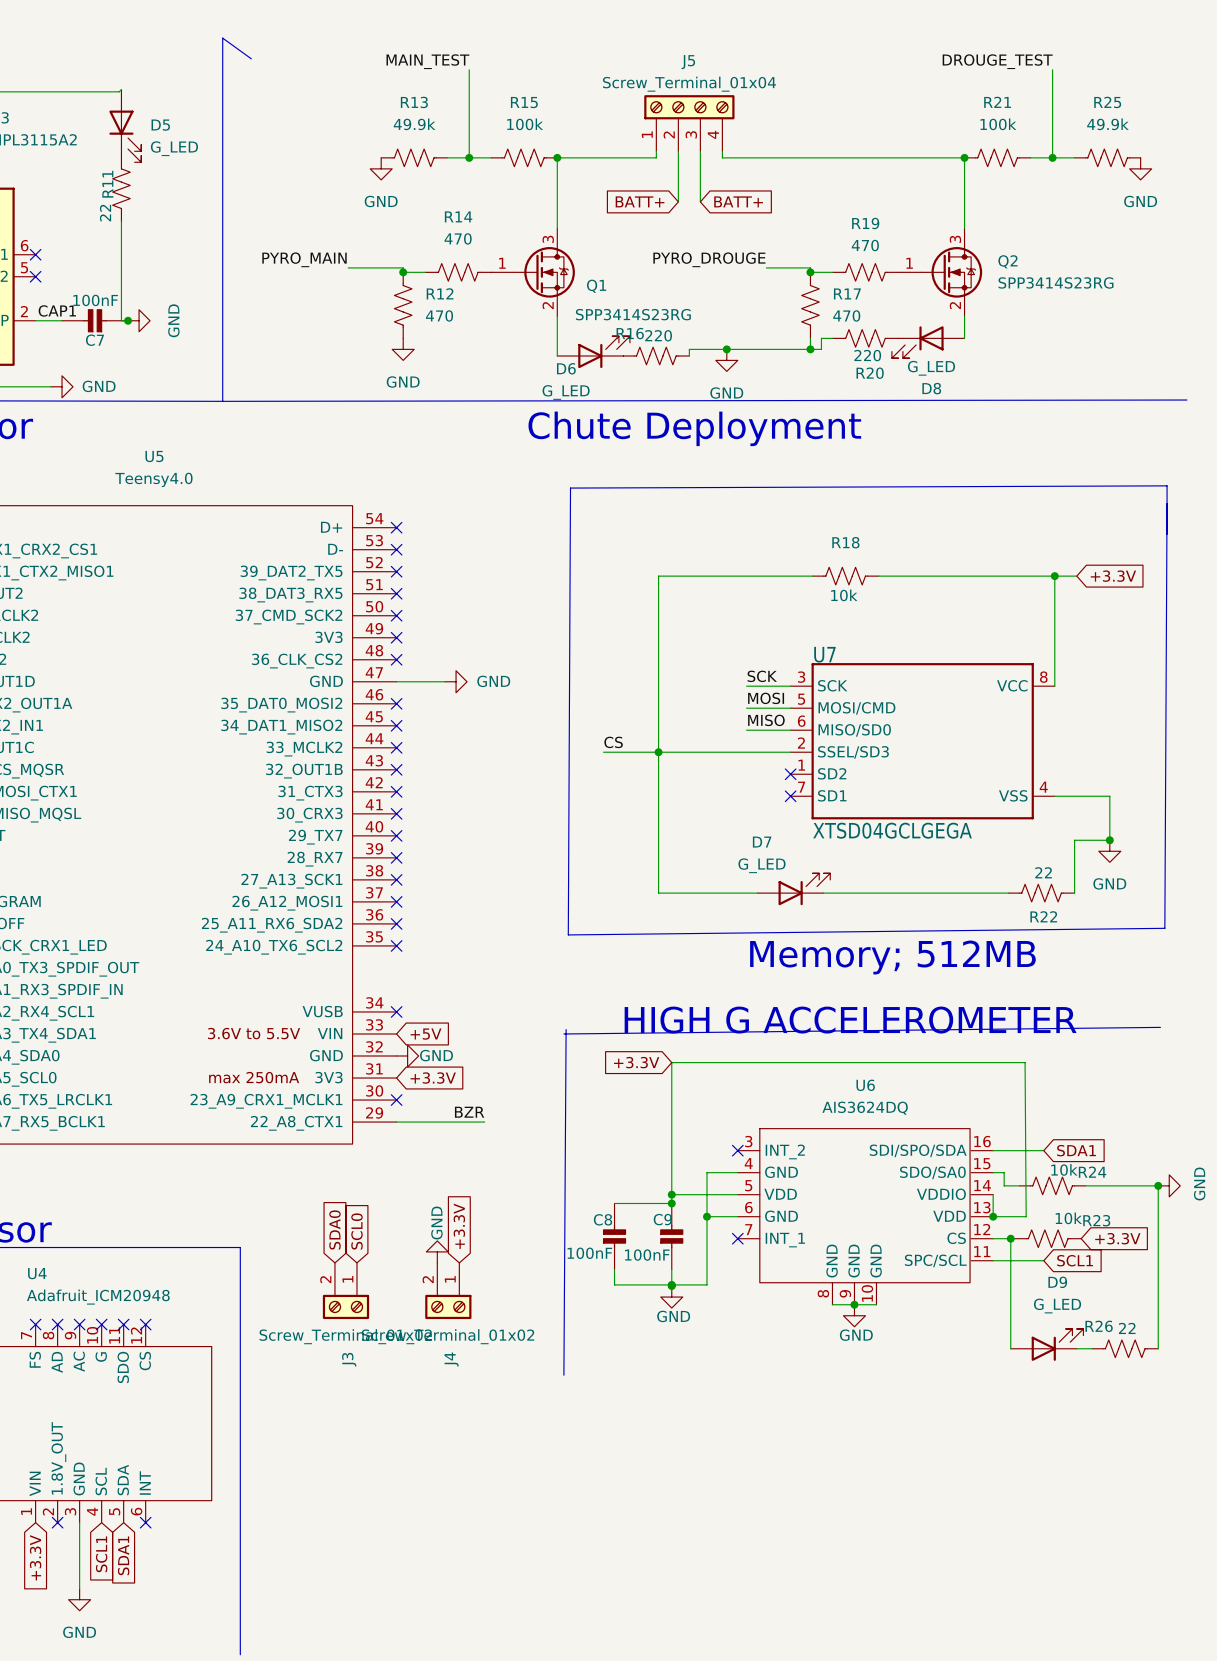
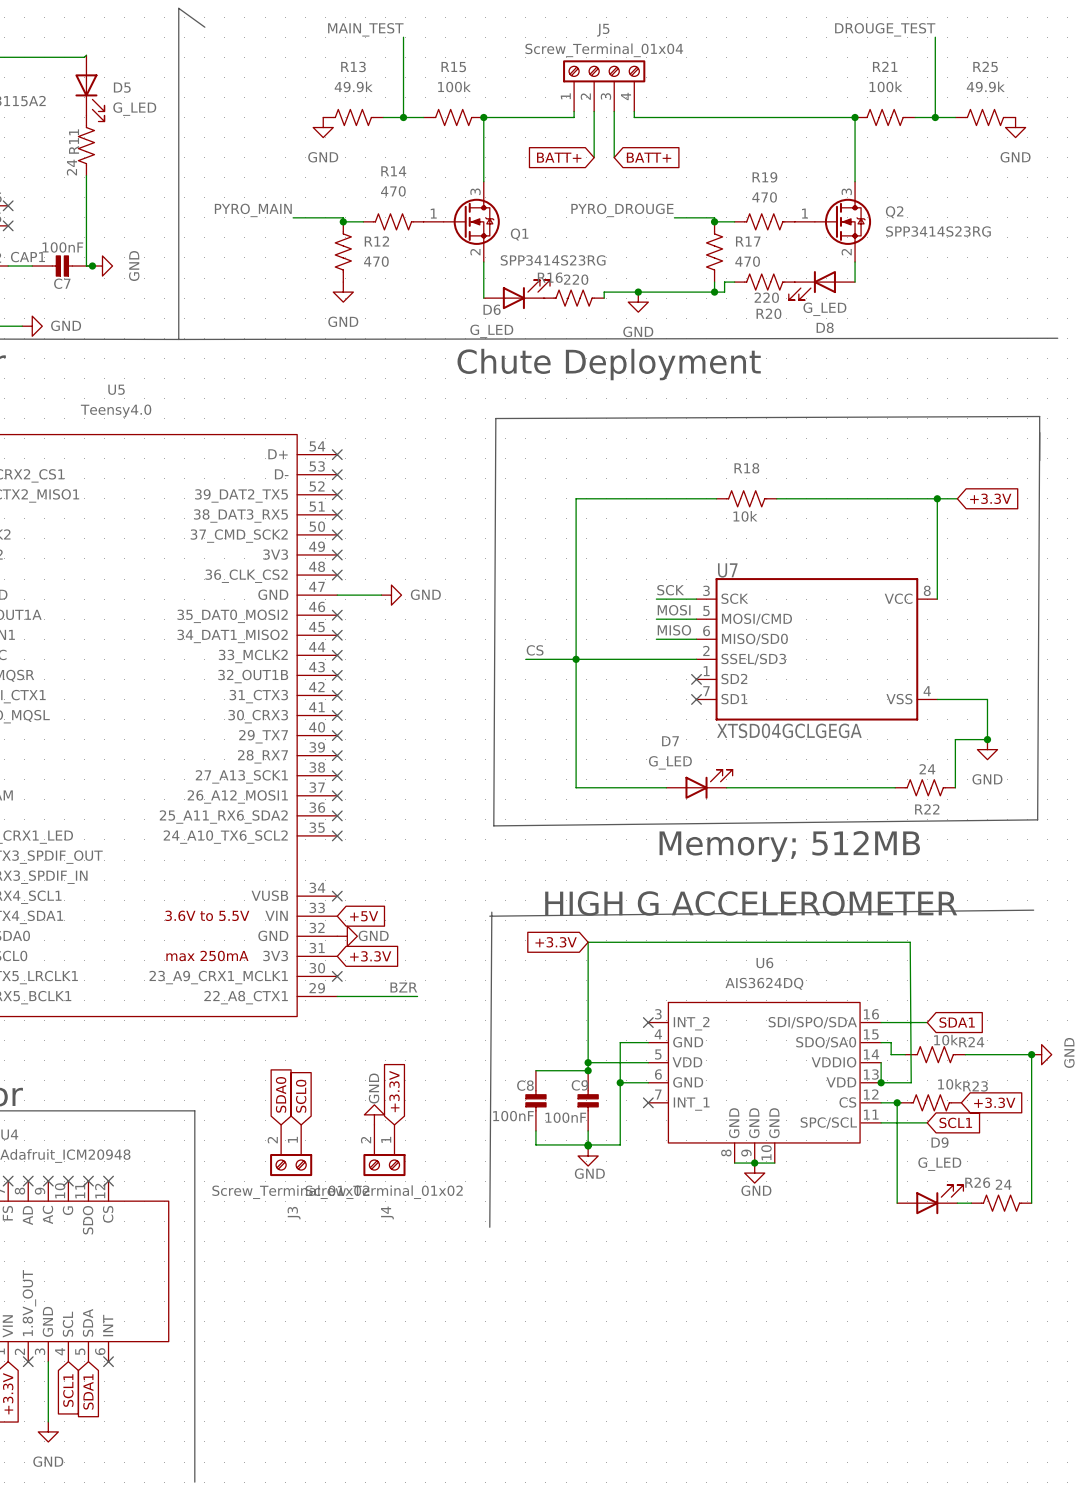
R11 value: 22 (105, 213) -> 24 (71, 167)
R22 value: 22 (1043, 872) -> 24 (927, 769)
R26 value: 22 (1127, 1328) -> 24 (1003, 1184)

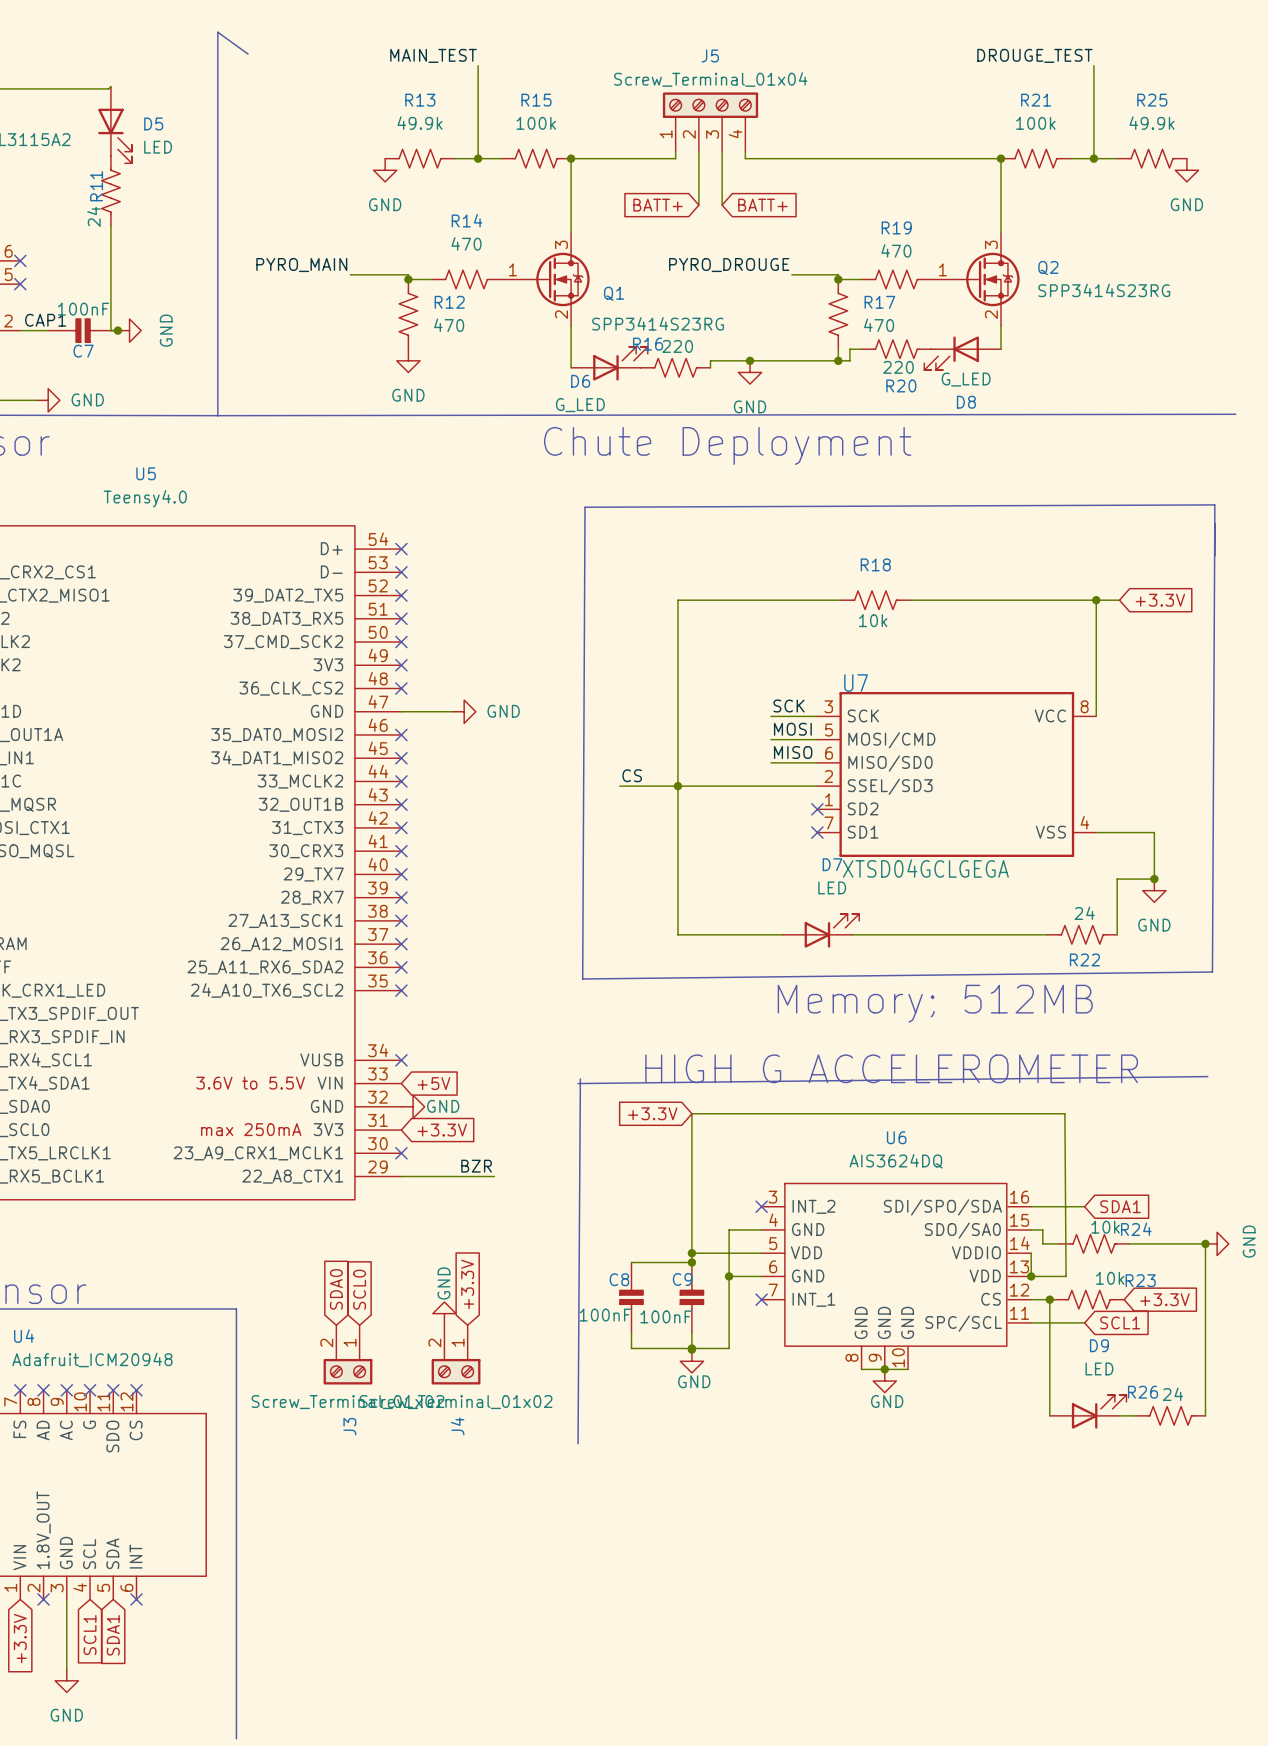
D5 value: G_LED (134, 109) -> LED (158, 147)
D7 name position: D7 (670, 741) -> D7 (832, 864)
D7 value: G_LED (670, 762) -> LED (832, 887)
D9 value: G_LED (939, 1164) -> LED (1099, 1368)

